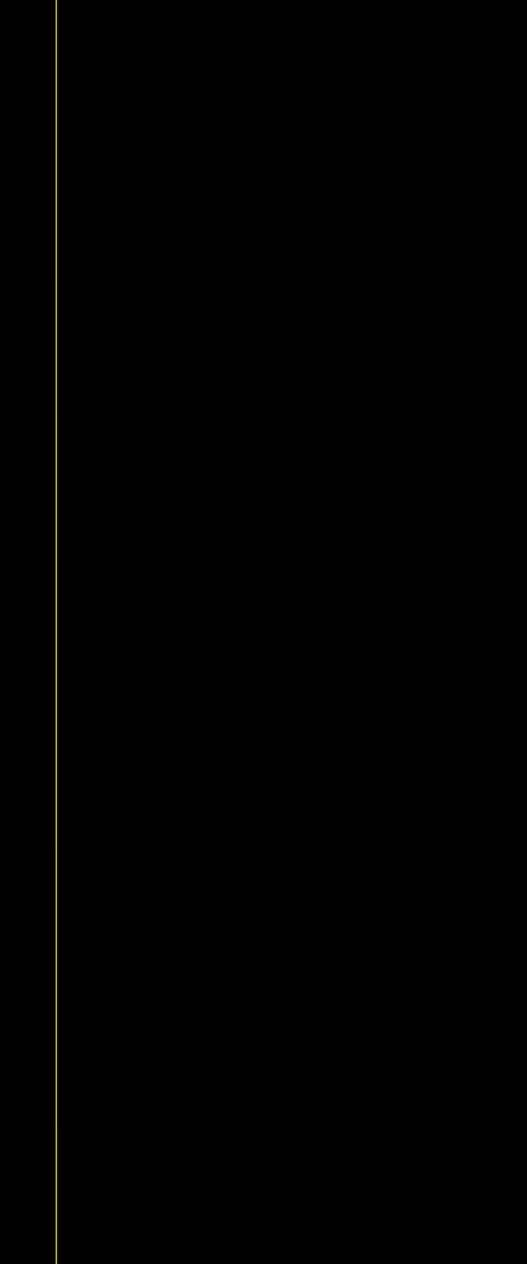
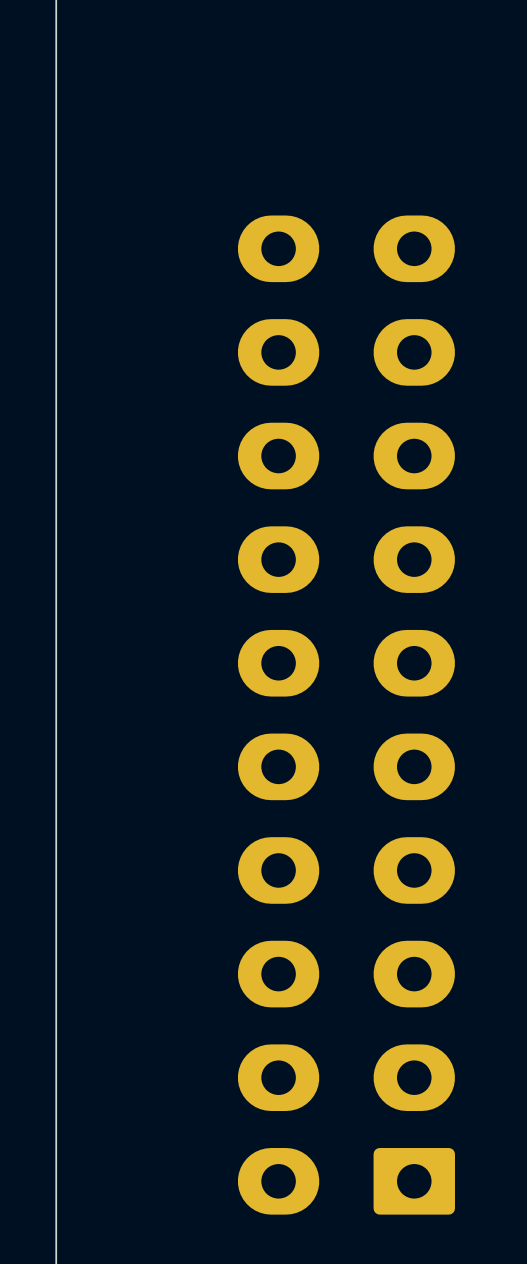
part: none -> (346, 715)

